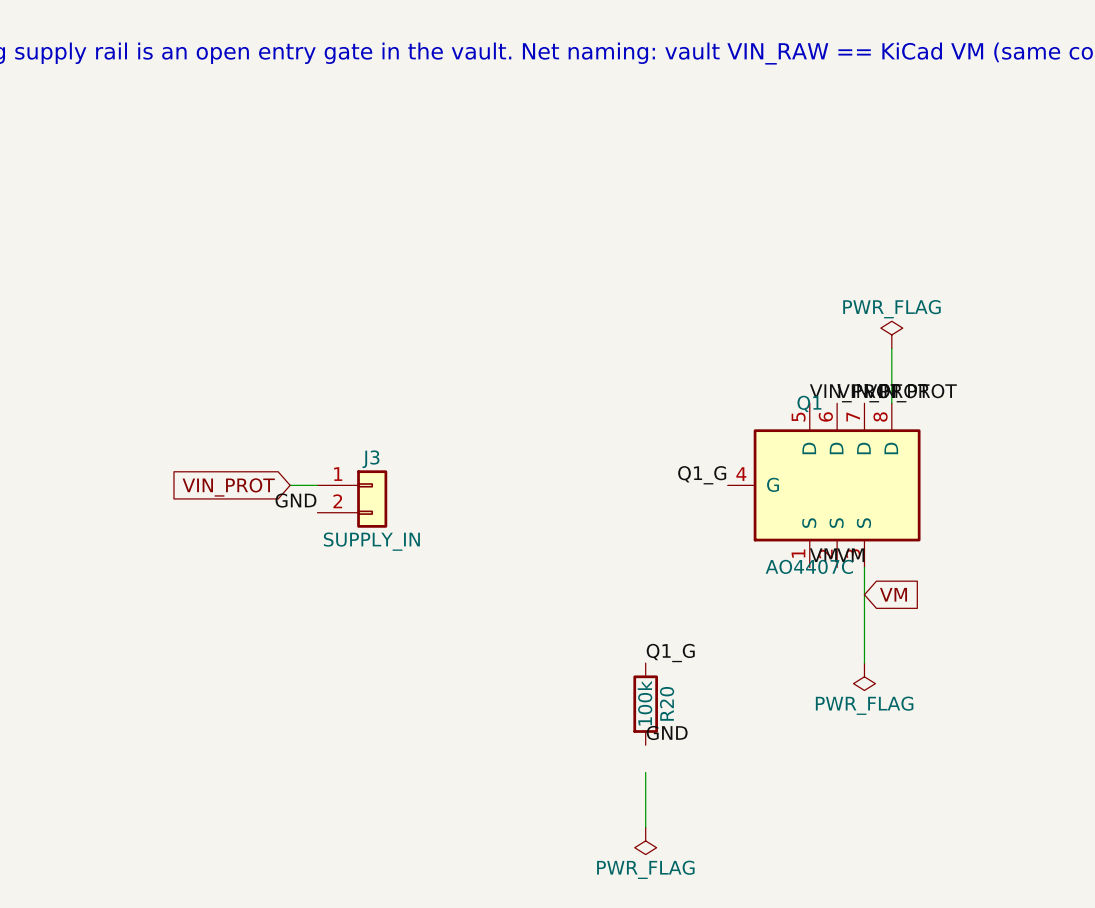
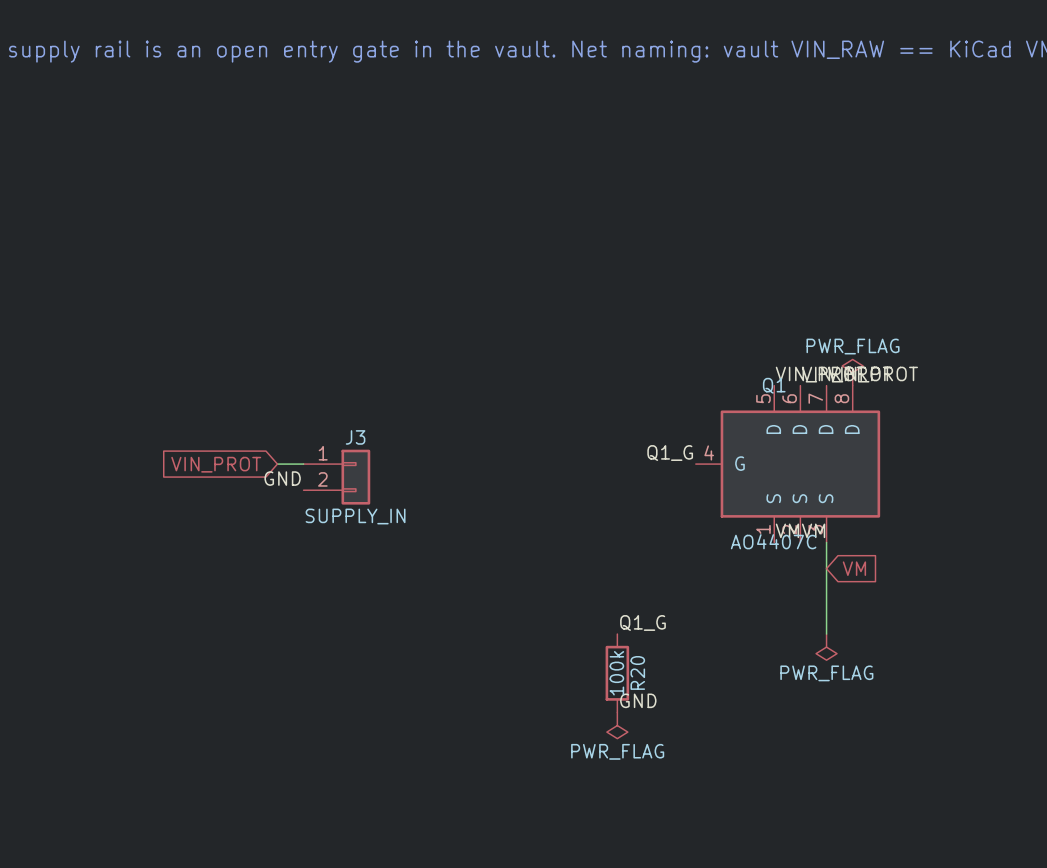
power symbol position: PWR_FLAG (891, 334) -> PWR_FLAG (852, 372)
wire: (891, 348) (891, 403) -> none
wire: (645, 772) (645, 827) -> none
power symbol position: PWR_FLAG (645, 840) -> PWR_FLAG (617, 725)

